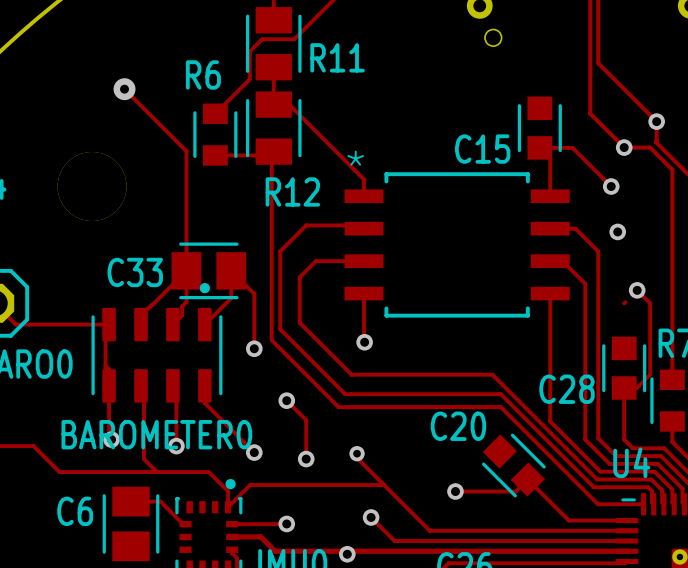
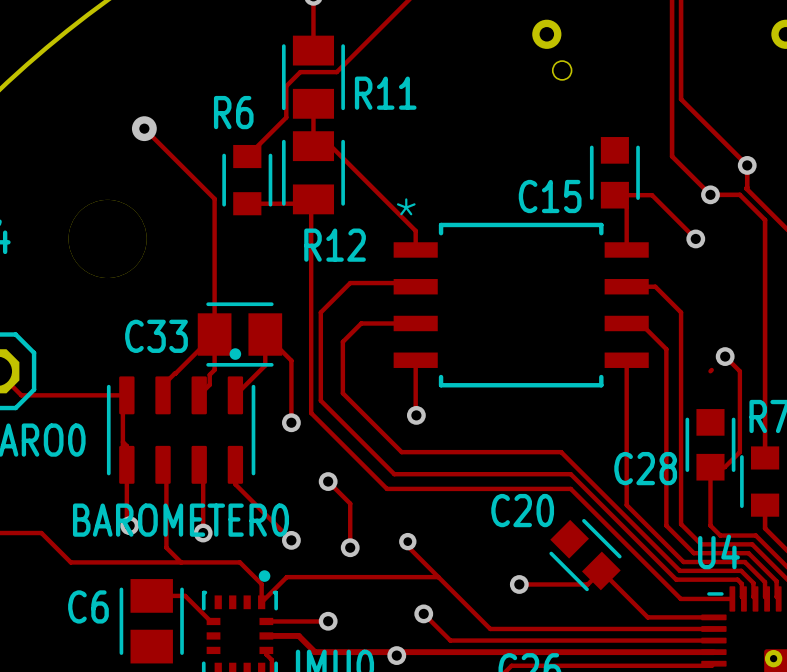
via: (617, 231) -> none

